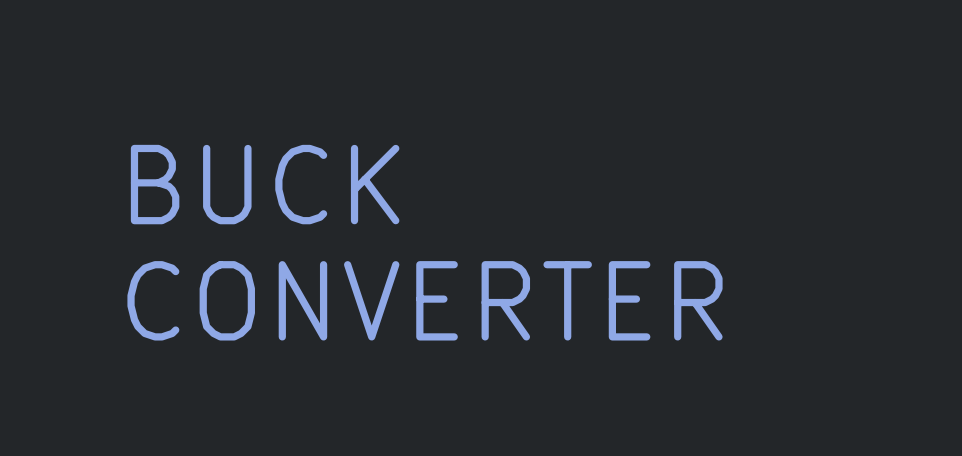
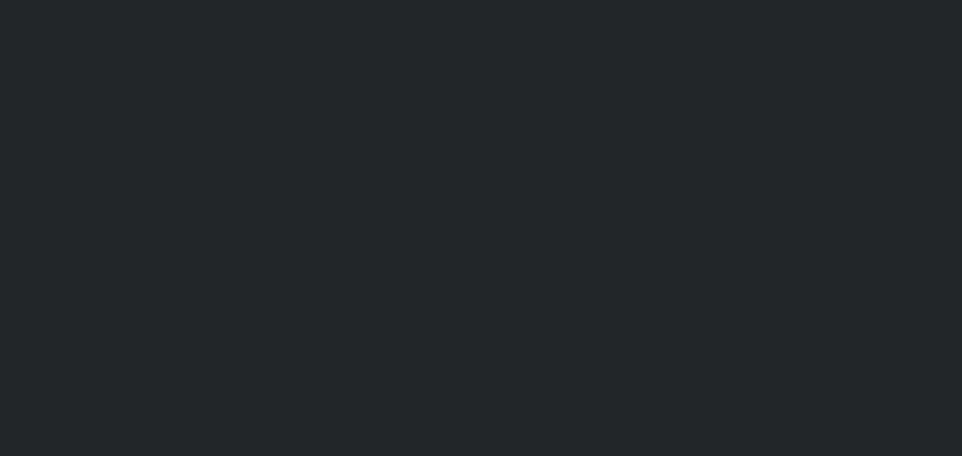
text: BUCK (265, 184) -> none
text: CONVERTER (425, 300) -> none

